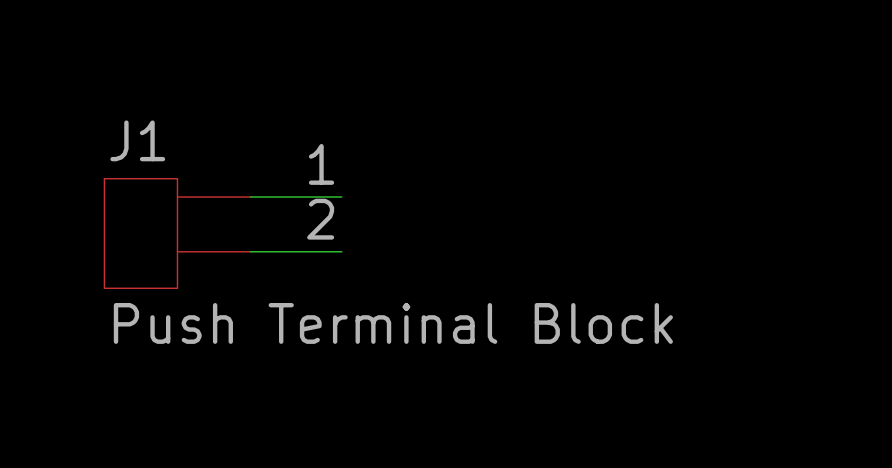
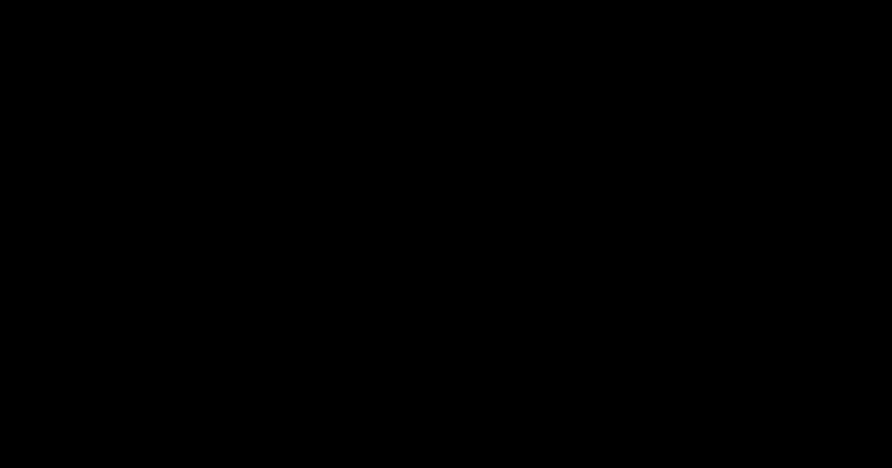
label: 1 (321, 164) -> none
wire: (250, 197) (341, 197) -> none
label: 2 (320, 219) -> none
J1: Push Terminal Block (177, 233) -> none
wire: (250, 251) (341, 251) -> none

